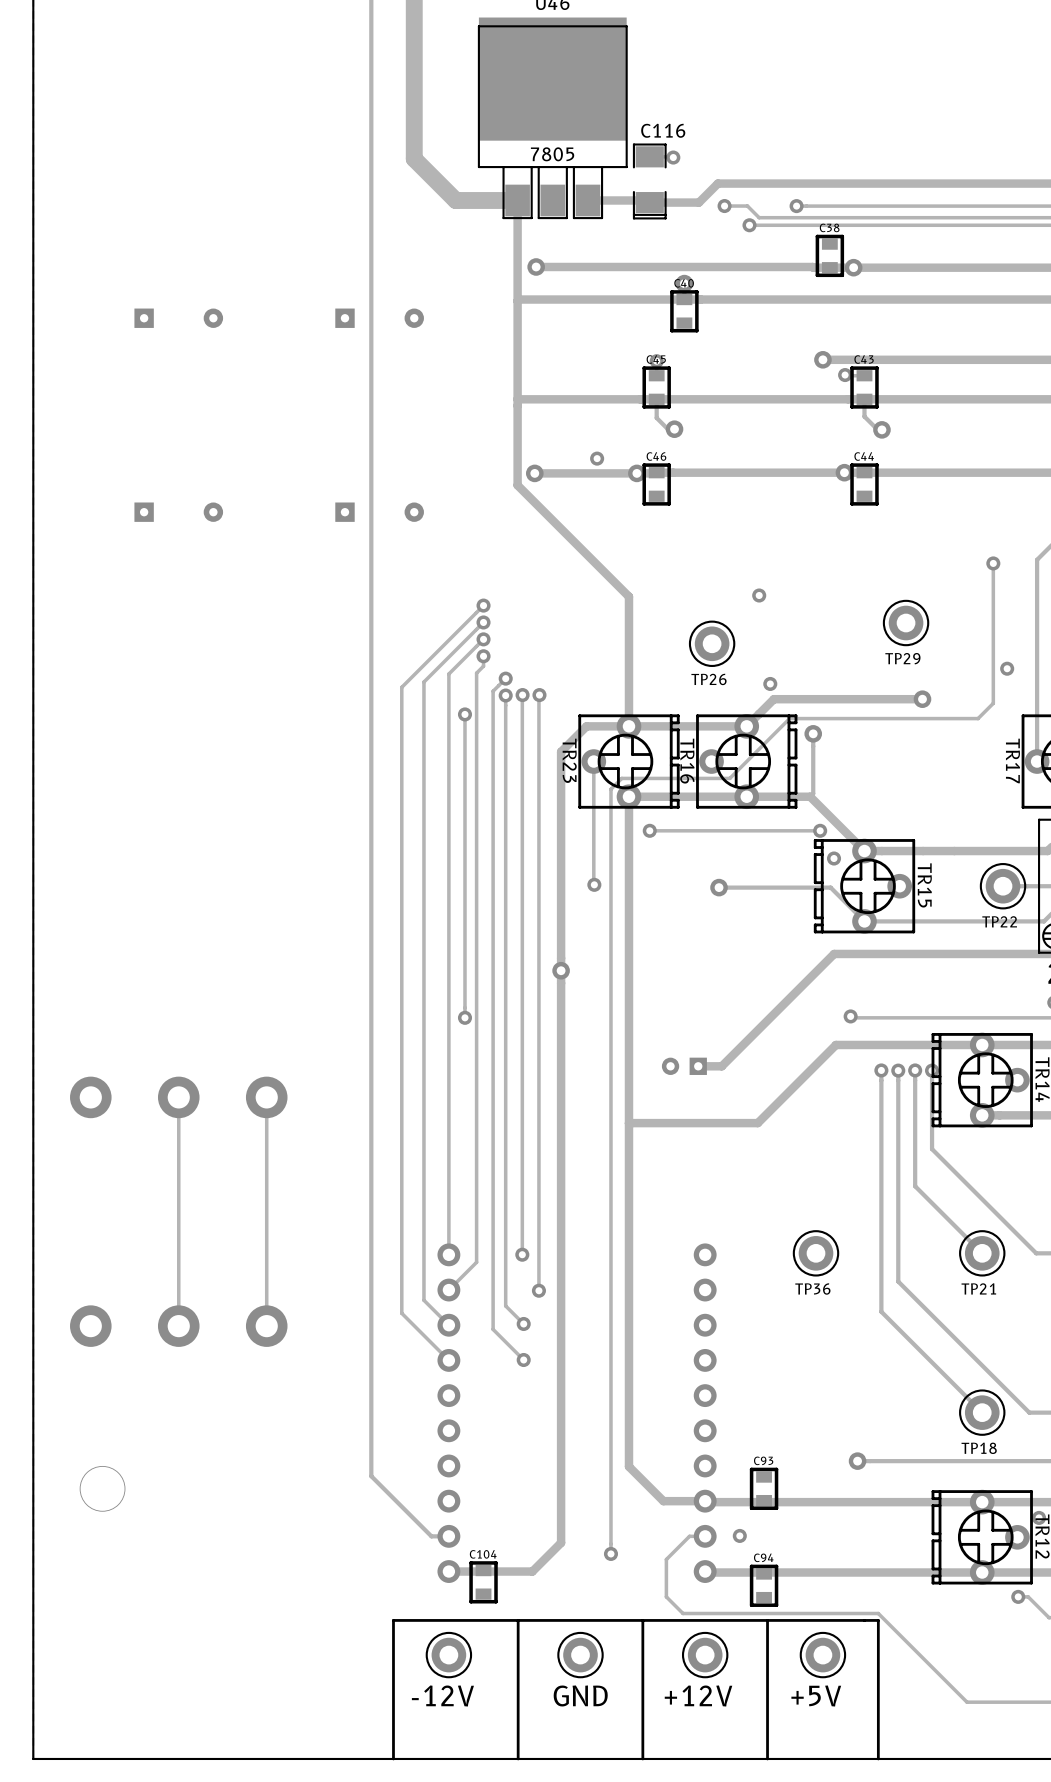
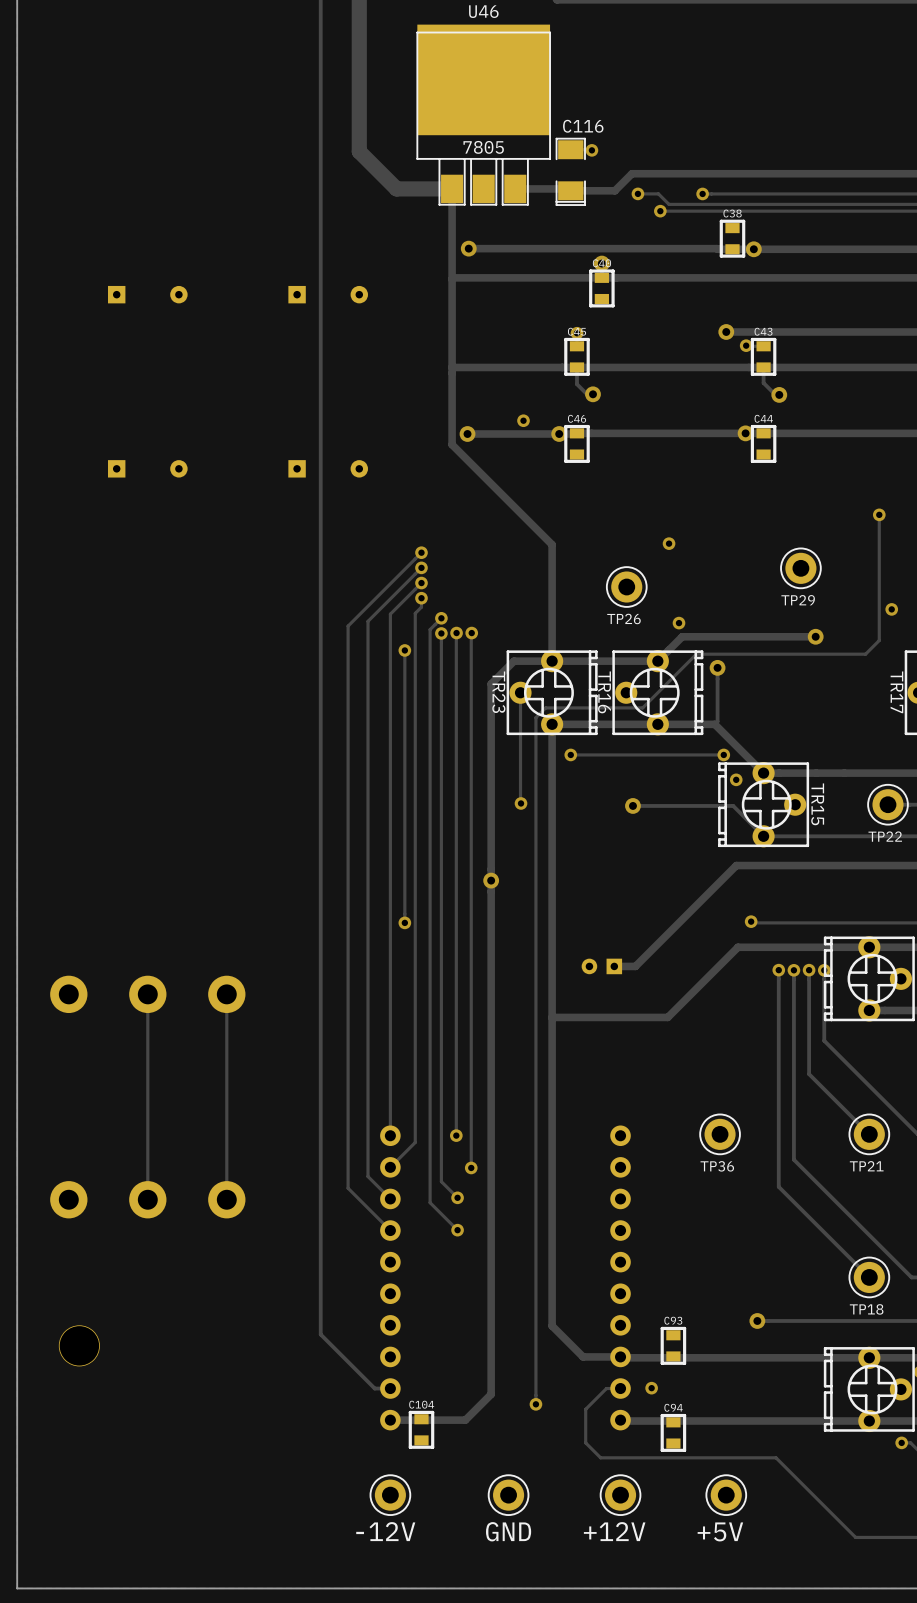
line: (518, 1620) (518, 1758) -> none
line: (642, 1620) (642, 1758) -> none
line: (767, 1620) (767, 1758) -> none
line: (878, 1758) (878, 1620) (393, 1620) (393, 1758) -> none

